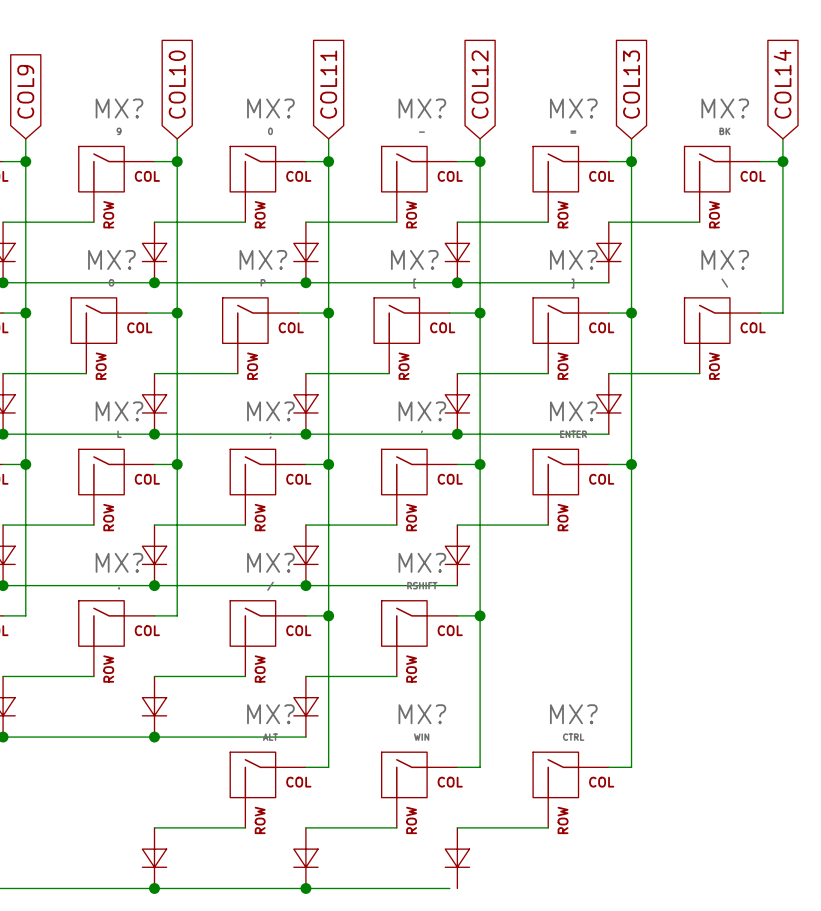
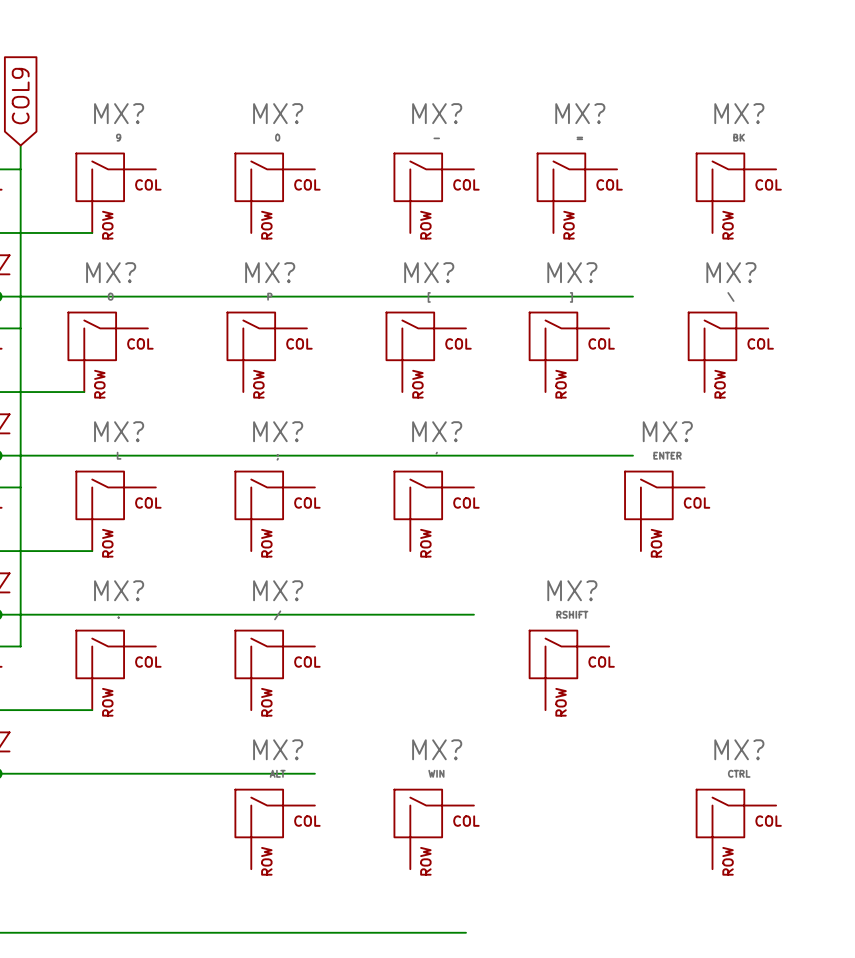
global label: COL10 (177, 84) -> none
global label: COL11 (328, 84) -> none
global label: COL12 (480, 84) -> none
global label: COL13 (631, 84) -> none
global label: COL14 (782, 84) -> none
wire: (177, 138) (177, 615) (154, 615) -> none
wire: (328, 138) (328, 767) (305, 767) -> none
wire: (480, 138) (480, 767) (457, 767) -> none
wire: (631, 138) (631, 767) (608, 767) -> none
wire: (782, 138) (782, 313) (760, 313) -> none
junction: (25, 161) -> none
wire: (154, 161) (177, 161) -> none
junction: (177, 161) -> none
wire: (305, 161) (328, 161) -> none
junction: (328, 161) -> none
wire: (457, 161) (480, 161) -> none
junction: (480, 161) -> none
wire: (608, 161) (631, 161) -> none
junction: (631, 161) -> none
wire: (760, 161) (782, 161) -> none
junction: (782, 161) -> none
MX? position: (570, 184) -> (577, 193)
MX? position: (722, 184) -> (736, 193)
wire: (154, 222) (245, 222) -> none
wire: (305, 222) (396, 222) -> none
wire: (457, 222) (548, 222) -> none
wire: (608, 222) (699, 222) -> none
part: (154, 252) -> none
part: (305, 252) -> none
part: (457, 252) -> none
part: (608, 252) -> none
junction: (154, 282) -> none
junction: (305, 282) -> none
junction: (457, 282) -> none
junction: (25, 313) -> none
wire: (146, 313) (177, 313) -> none
junction: (177, 313) -> none
wire: (298, 313) (328, 313) -> none
junction: (328, 313) -> none
wire: (449, 313) (480, 313) -> none
junction: (480, 313) -> none
wire: (608, 313) (631, 313) -> none
junction: (631, 313) -> none
MX? position: (570, 335) -> (569, 352)
MX? position: (722, 335) -> (728, 352)
wire: (154, 373) (237, 373) -> none
wire: (305, 373) (389, 373) -> none
wire: (457, 373) (548, 373) -> none
wire: (608, 373) (699, 373) -> none
part: (154, 403) -> none
part: (305, 403) -> none
part: (457, 403) -> none
part: (608, 403) -> none
junction: (154, 434) -> none
junction: (305, 434) -> none
junction: (457, 434) -> none
junction: (25, 464) -> none
wire: (154, 464) (177, 464) -> none
junction: (177, 464) -> none
wire: (305, 464) (328, 464) -> none
junction: (328, 464) -> none
wire: (457, 464) (480, 464) -> none
junction: (480, 464) -> none
wire: (608, 464) (631, 464) -> none
junction: (631, 464) -> none
MX? position: (570, 487) -> (664, 511)
wire: (154, 525) (245, 525) -> none
wire: (305, 525) (396, 525) -> none
wire: (457, 525) (548, 525) -> none
part: (154, 555) -> none
part: (305, 555) -> none
part: (457, 555) -> none
junction: (154, 585) -> none
junction: (305, 585) -> none
wire: (305, 615) (328, 615) -> none
junction: (328, 615) -> none
wire: (457, 615) (480, 615) -> none
junction: (480, 615) -> none
MX? position: (419, 638) -> (569, 670)
wire: (154, 676) (245, 676) -> none
wire: (305, 676) (396, 676) -> none
part: (154, 706) -> none
part: (305, 706) -> none
junction: (154, 737) -> none
MX? position: (570, 790) -> (736, 829)
wire: (154, 827) (245, 827) -> none
wire: (305, 827) (396, 827) -> none
wire: (457, 827) (548, 827) -> none
part: (154, 858) -> none
part: (305, 858) -> none
part: (457, 858) -> none
junction: (154, 888) -> none
junction: (305, 888) -> none

